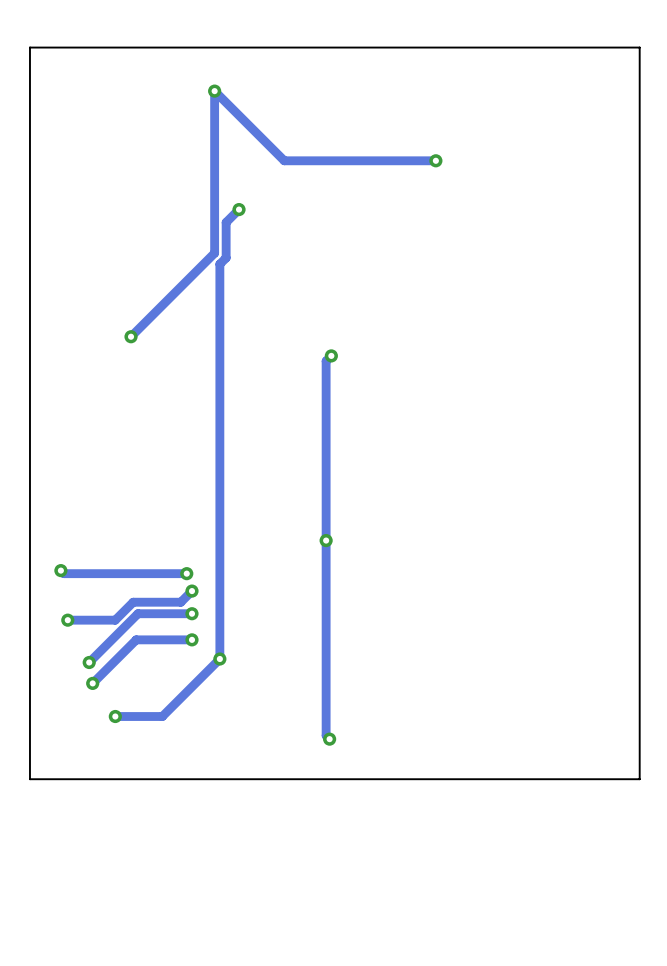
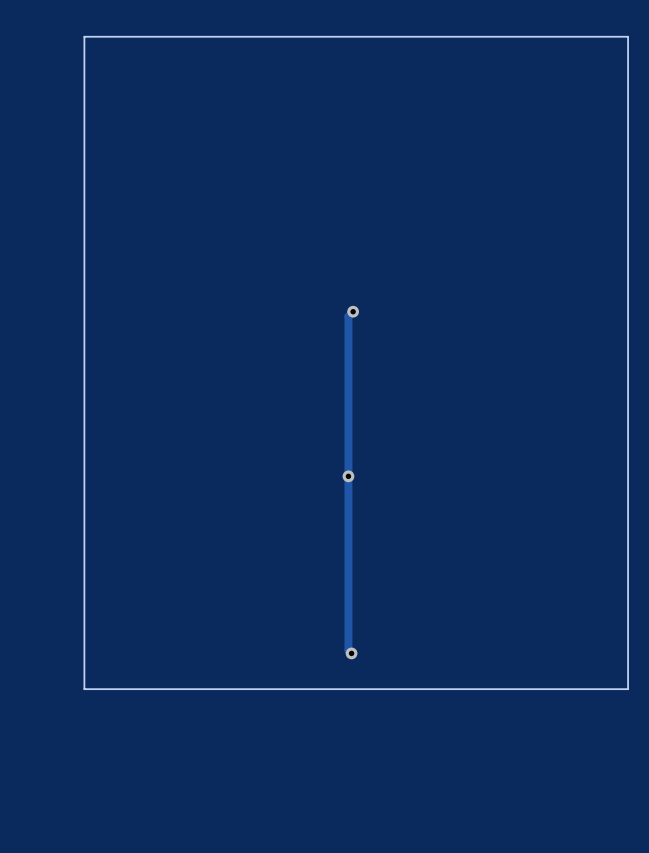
via: (214, 91) -> none
track: (435, 160) (284, 160) (214, 91) (214, 253) (131, 336) -> none
via: (435, 160) -> none
track: (239, 209) (226, 222) (226, 257) (219, 264) (219, 659) (162, 716) (115, 716) -> none
via: (239, 209) -> none
via: (131, 336) -> none
track: (60, 570) (63, 573) (186, 573) -> none
via: (60, 570) -> none
via: (186, 573) -> none
track: (191, 591) (180, 602) (133, 602) (115, 620) (67, 620) -> none
via: (191, 591) -> none
track: (191, 613) (137, 613) (89, 662) -> none
via: (191, 613) -> none
via: (67, 620) -> none
track: (191, 639) (136, 639) (92, 683) -> none
via: (191, 639) -> none
via: (219, 659) -> none
via: (89, 662) -> none
via: (92, 683) -> none
via: (115, 716) -> none

